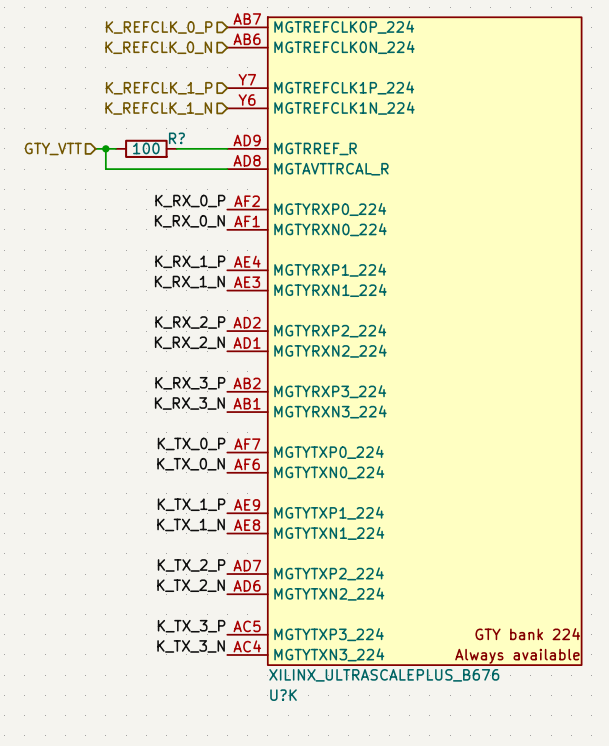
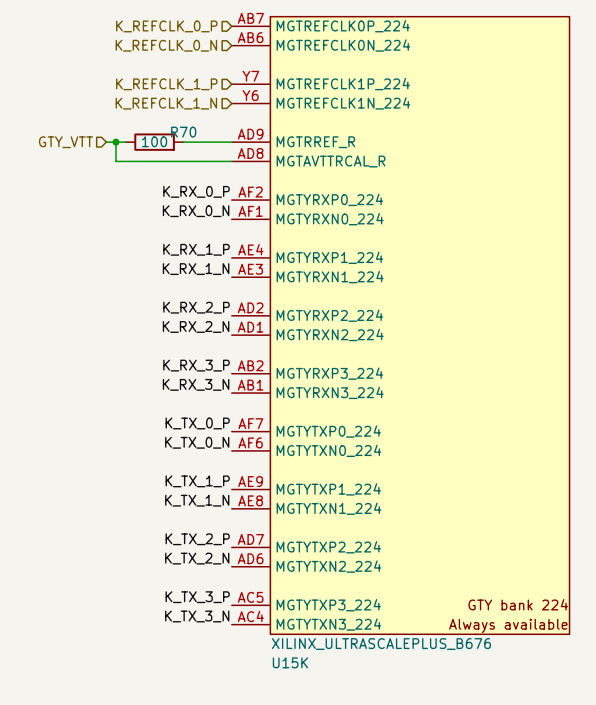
R? name: R? (176, 138) -> R70 (183, 132)
U?K name: U?K (283, 695) -> U15K (290, 662)

